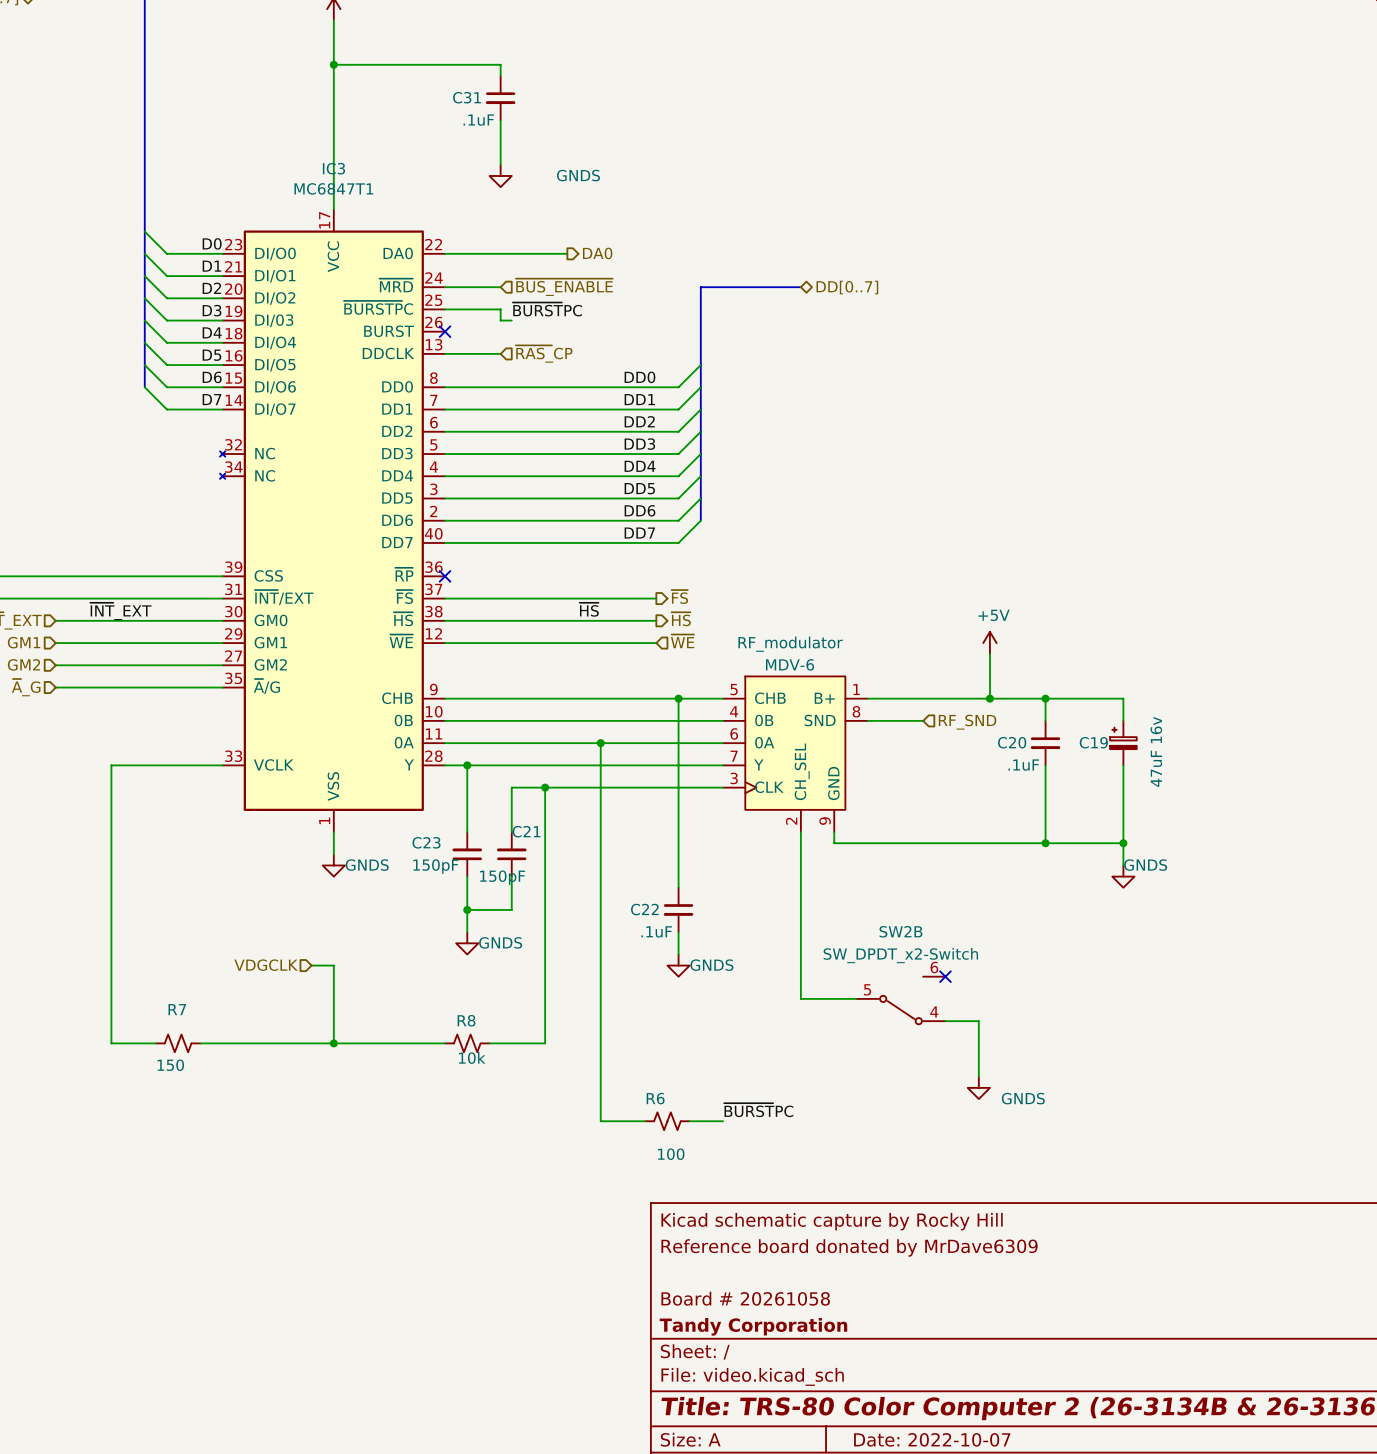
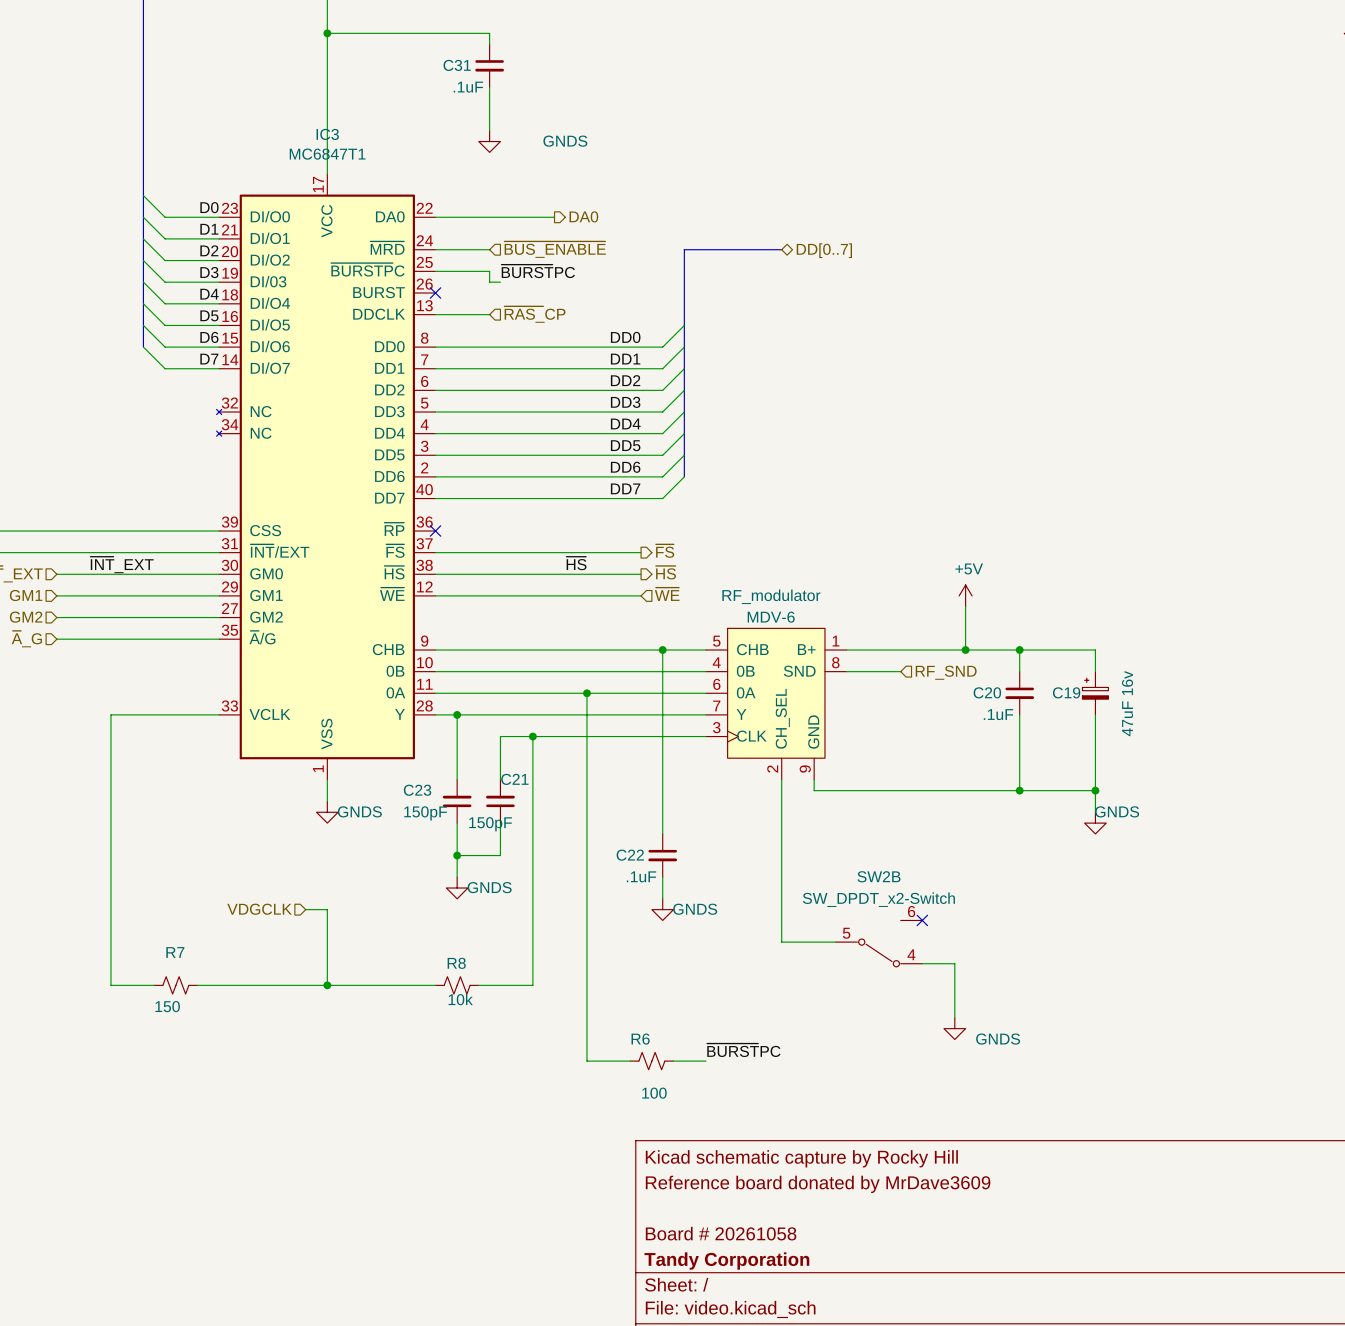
title block: Reference board donated by MrDave6309 (849, 1247) -> Reference board donated by MrDave3609 (818, 1184)

